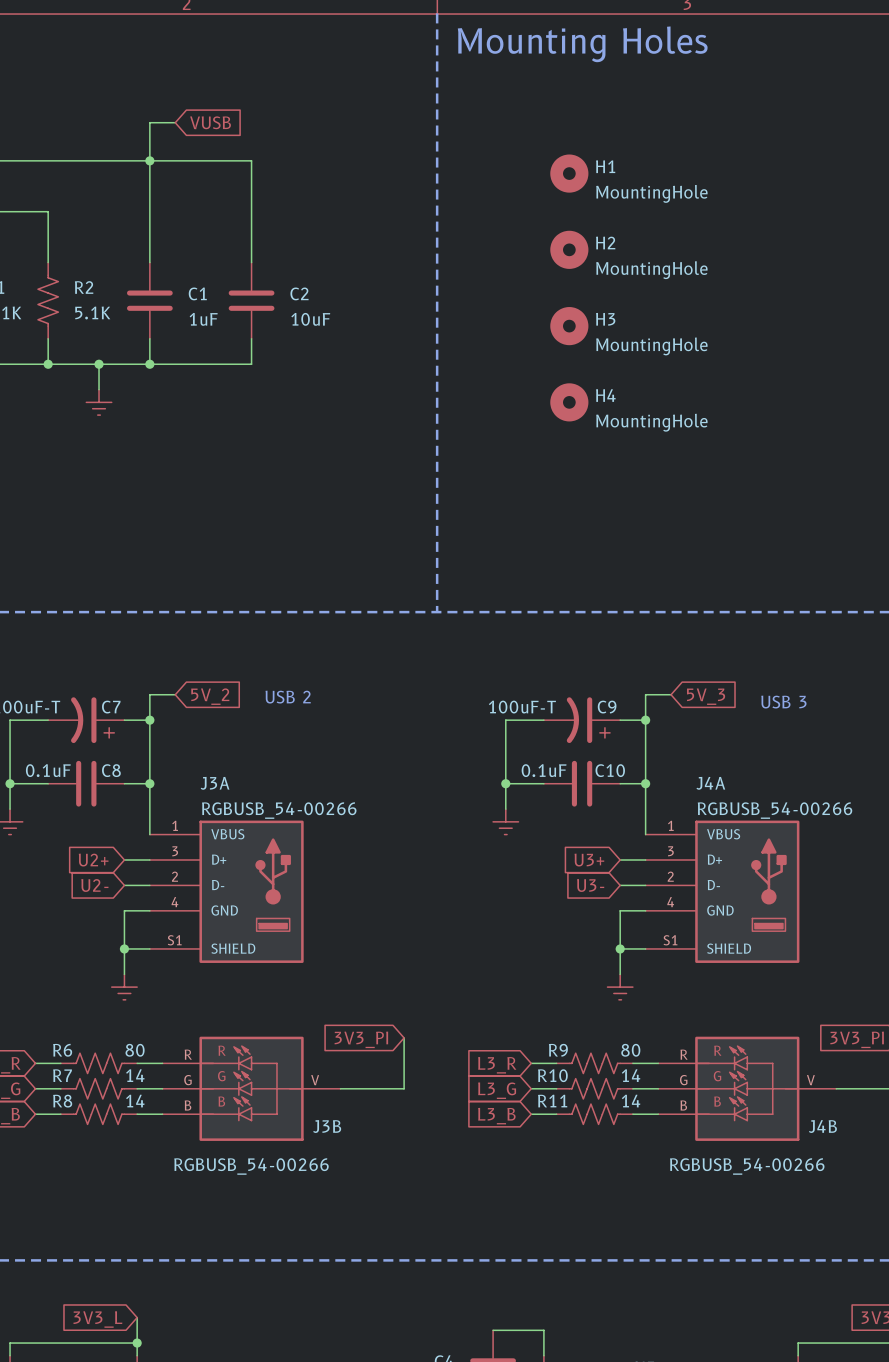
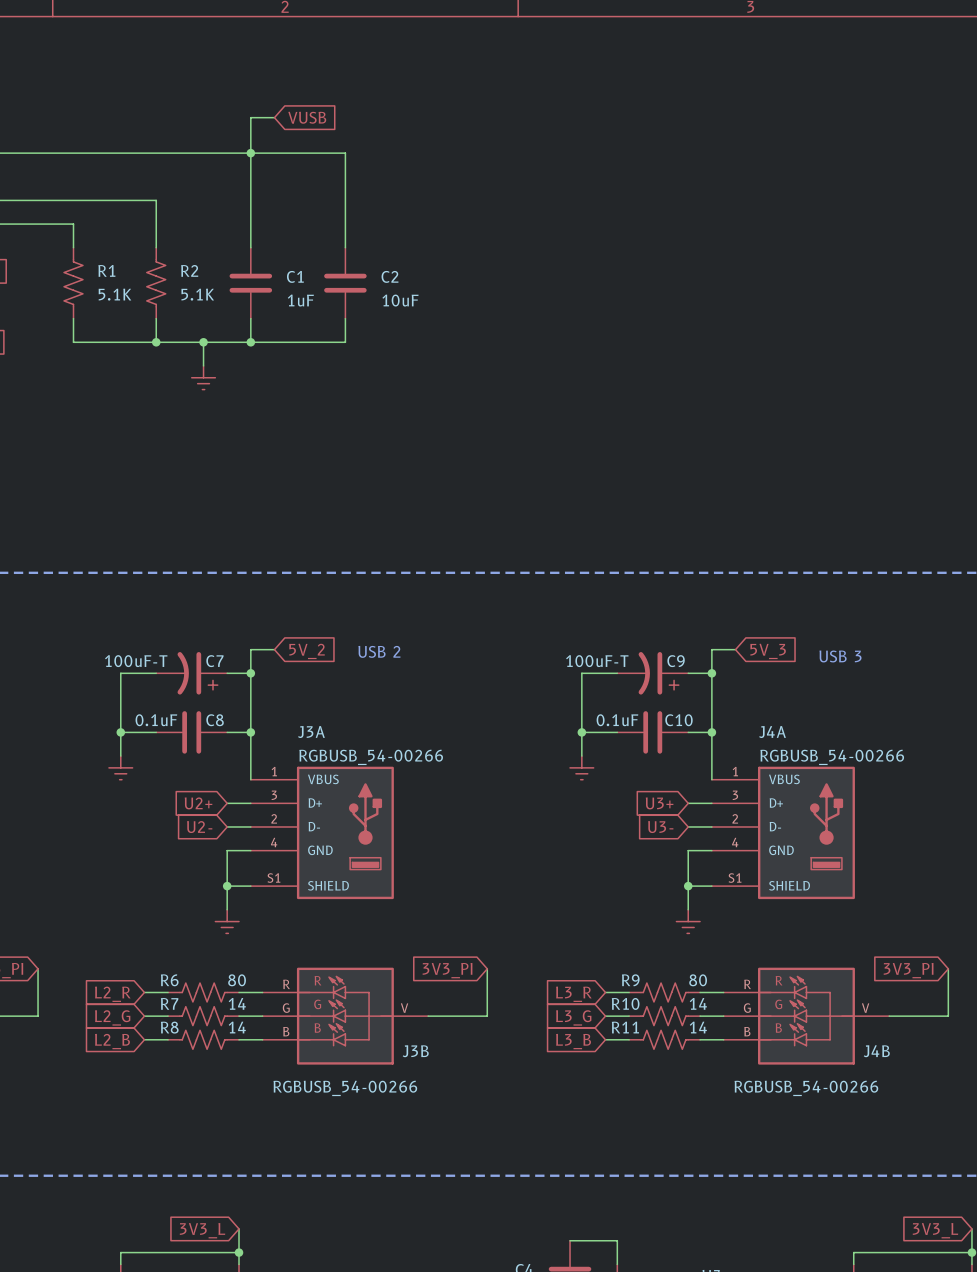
line: (437, 13) (437, 610) -> none
text: Mounting Holes (582, 44) -> none
H1: MountingHole (569, 173) -> none
H2: MountingHole (569, 249) -> none
H3: MountingHole (569, 326) -> none
H4: MountingHole (569, 402) -> none

